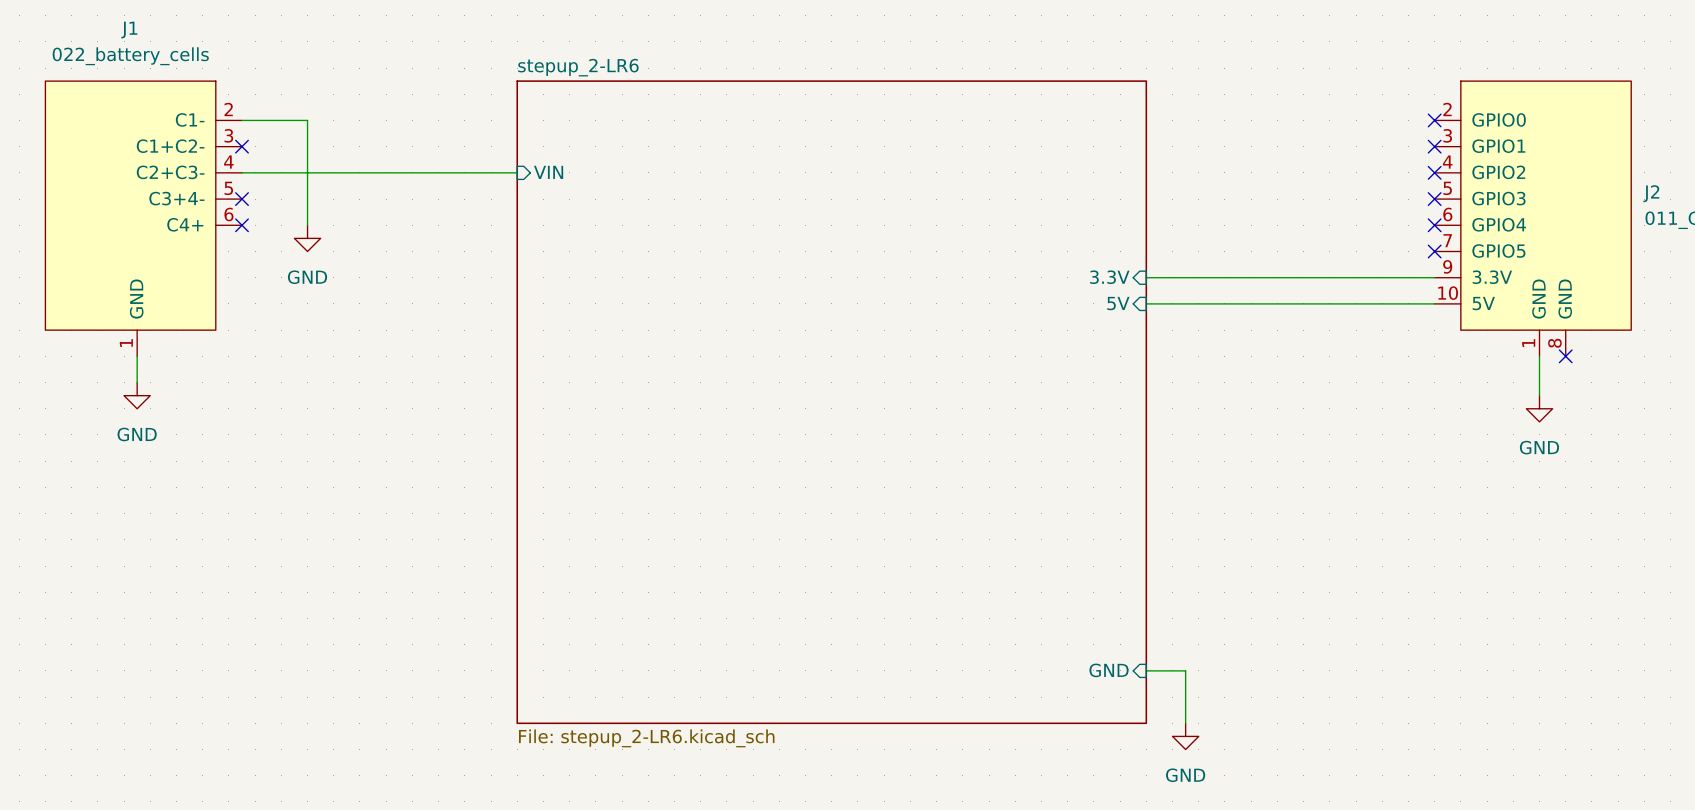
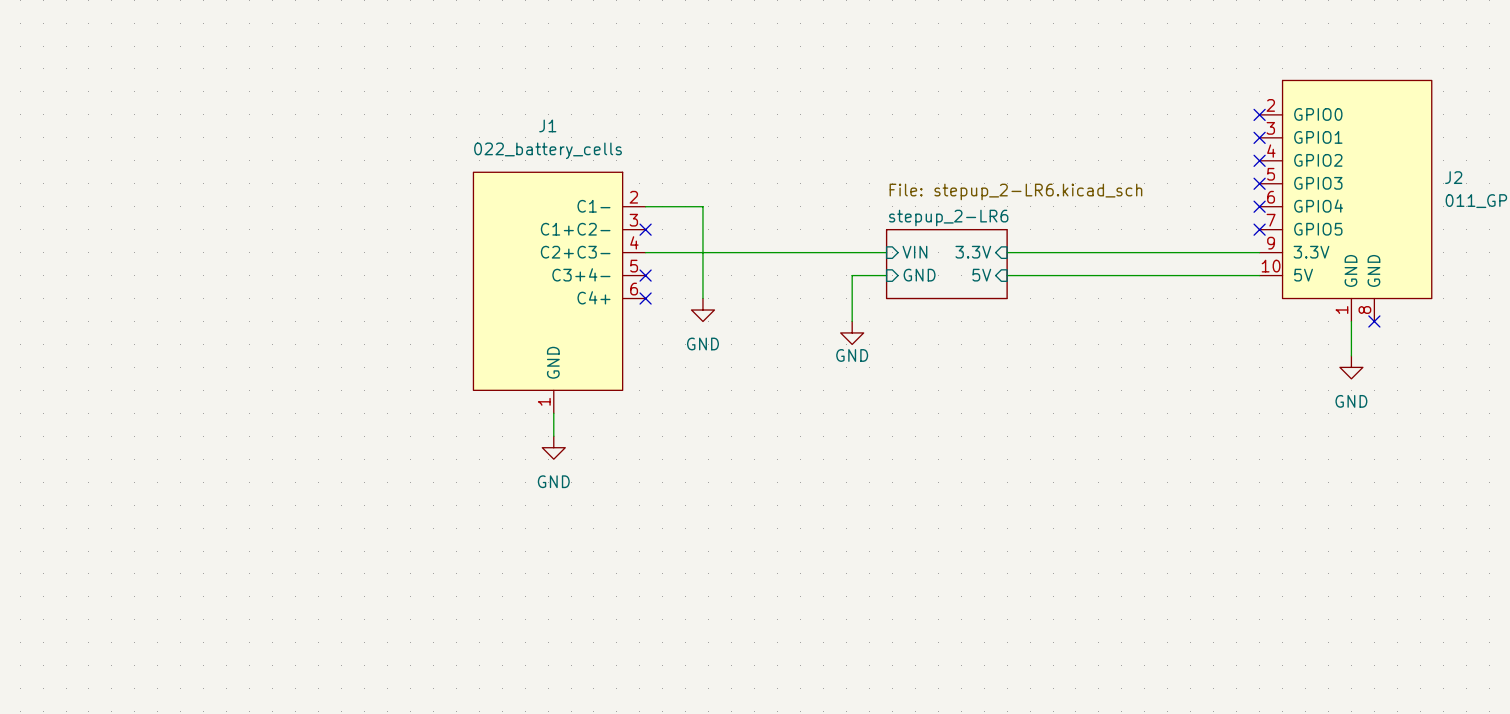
sheet stepup_2-LR6 name position: stepup_2-LR6 (578, 67) -> stepup_2-LR6 (948, 218)
sheet stepup_2-LR6 shape: [516, 80, 1148, 725] -> [885, 228, 1008, 300]
wire: (242, 120) (307, 120) (307, 225) -> none
no-connect mark: (242, 146) -> none
wire: (242, 172) (517, 172) -> none
sheet pin: VIN (548, 172) -> none
no-connect mark: (242, 199) -> none
J1 position: (143, 218) -> (559, 292)
no-connect mark: (242, 225) -> none
wire: none -> (645, 206) (702, 206) (702, 298)
power symbol: GND (307, 238) -> none
no-connect mark: none -> (645, 229)
wire: none -> (645, 252) (886, 252)
sheet pin: none -> VIN (914, 252)
no-connect mark: none -> (645, 275)
wire: none -> (886, 275) (852, 275) (852, 321)
sheet pin: none -> GND (919, 275)
no-connect mark: none -> (645, 298)
power symbol: none -> GND (702, 310)
wire: (137, 356) (137, 382) -> none
power symbol: none -> GND (852, 332)
power symbol: GND (137, 395) -> none
wire: none -> (553, 413) (553, 436)
power symbol: none -> GND (553, 447)
sheet pin: GND (1109, 670) -> none
wire: (1146, 670) (1185, 670) (1185, 723) -> none
power symbol: GND (1185, 736) -> none
sheet stepup_2-LR6 value position: File: stepup_2-LR6.kicad_sch (646, 738) -> File: stepup_2-LR6.kicad_sch (1015, 191)

